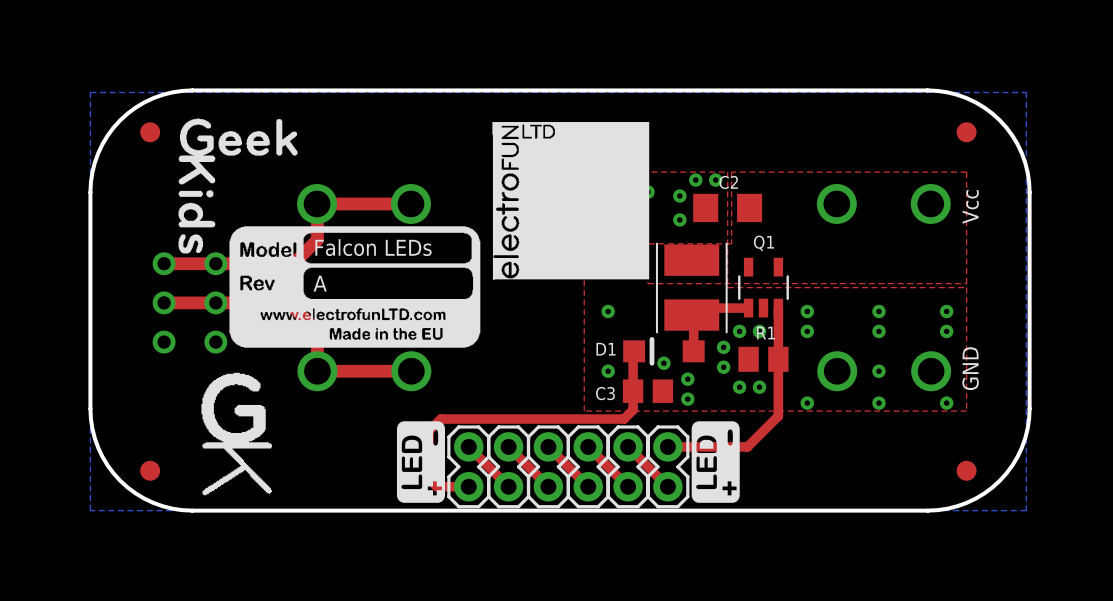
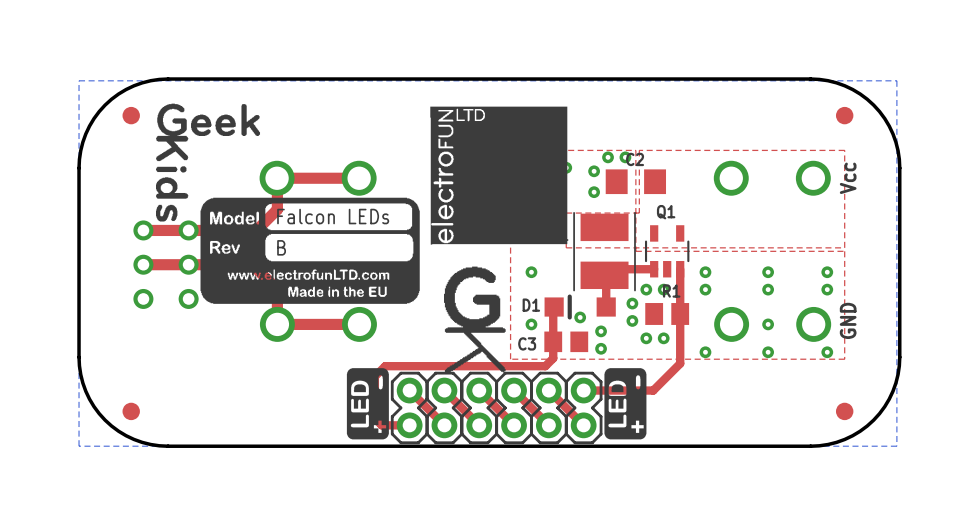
text: A (320, 283) -> B (281, 247)
drawing position: (236, 434) -> (474, 320)

